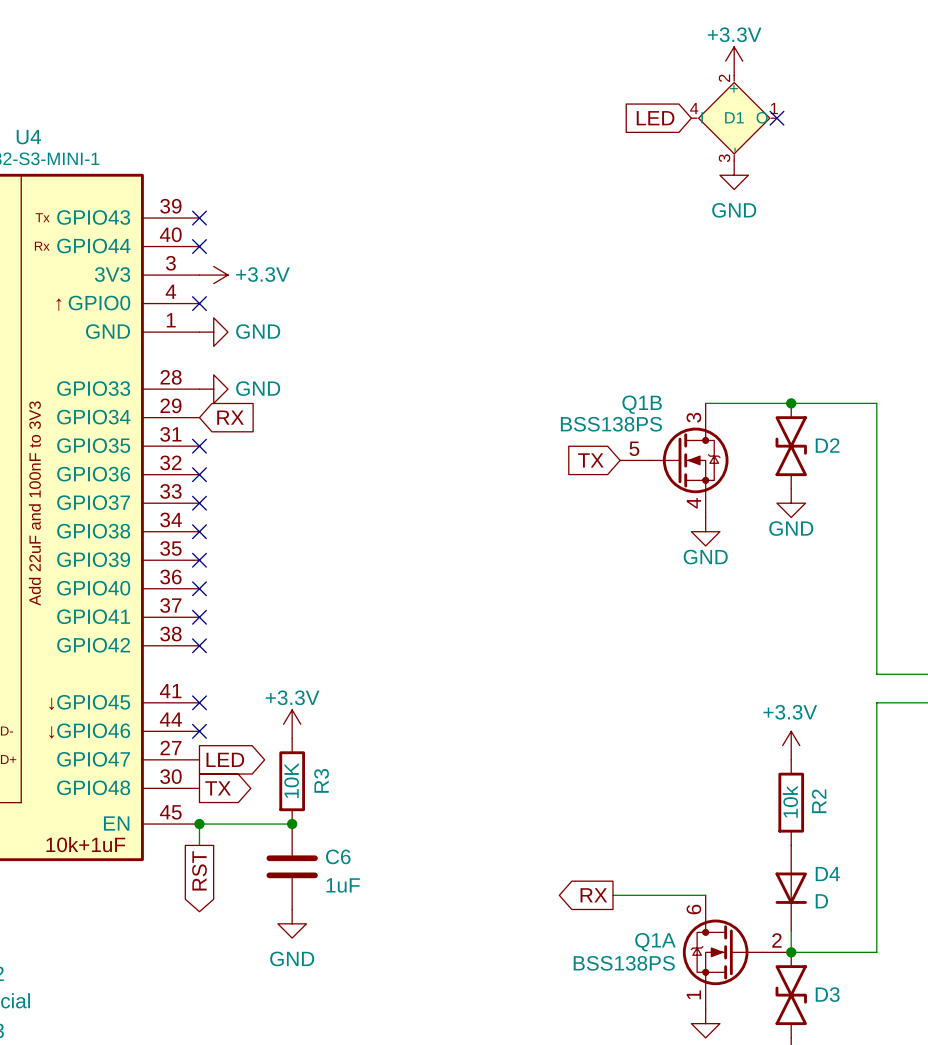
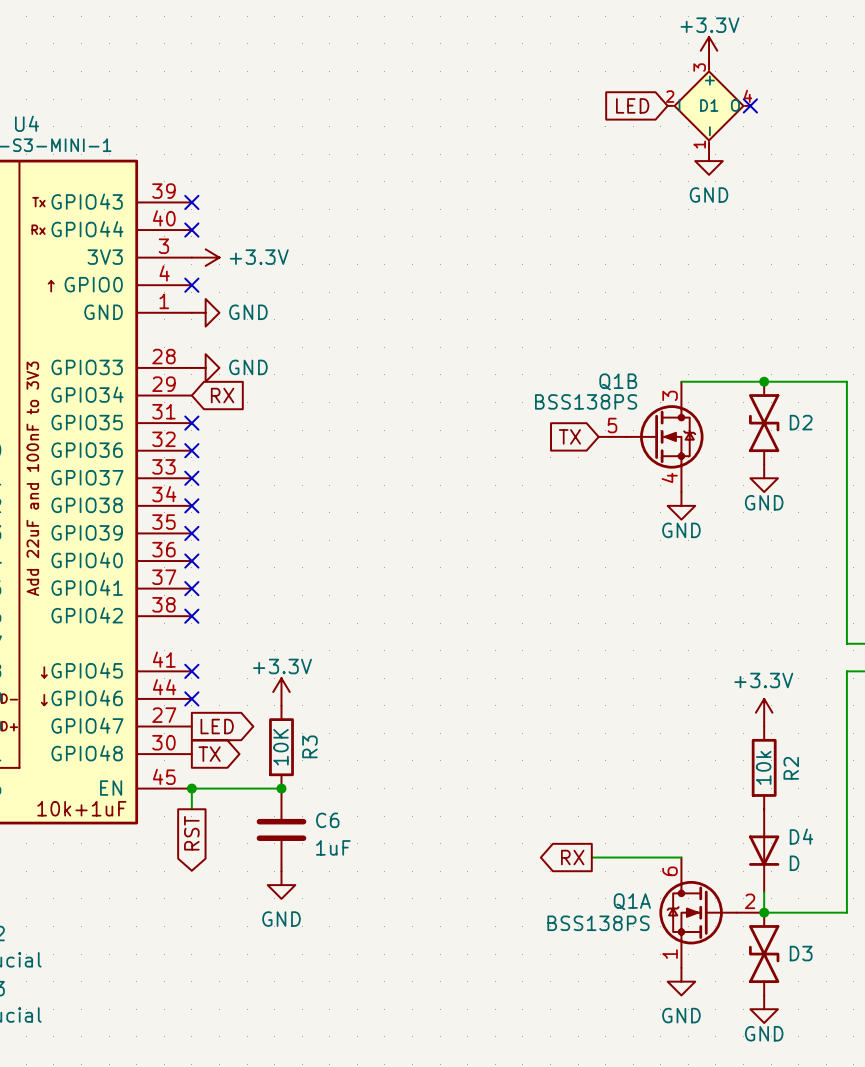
D1 pin number: 2 (724, 78) -> 3 (699, 67)
D1 pin number: 4 (694, 108) -> 2 (670, 96)
D1 pin number: 1 (774, 108) -> 4 (747, 96)
D1 pin number: 3 (724, 158) -> 1 (699, 144)

